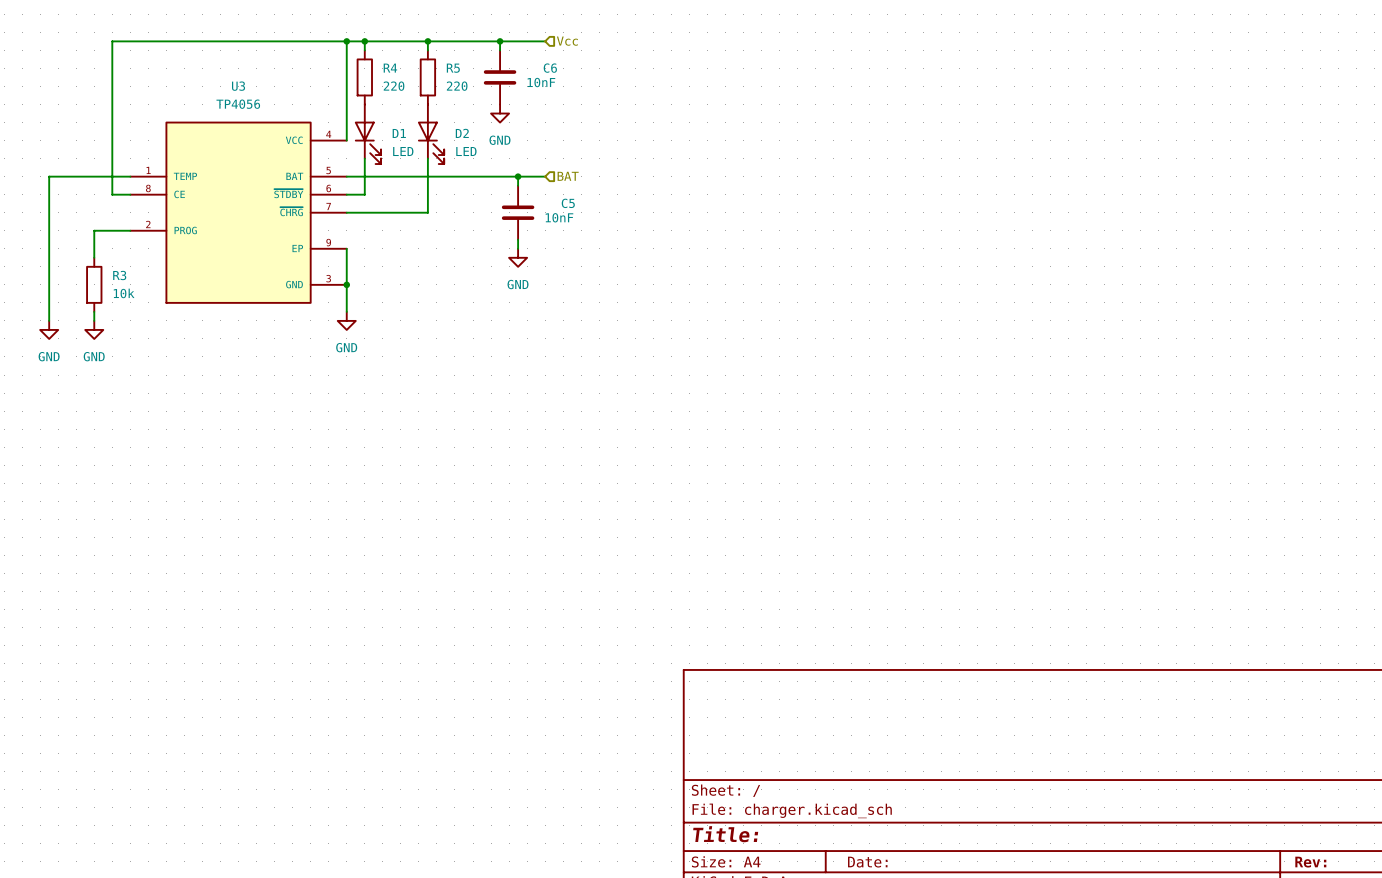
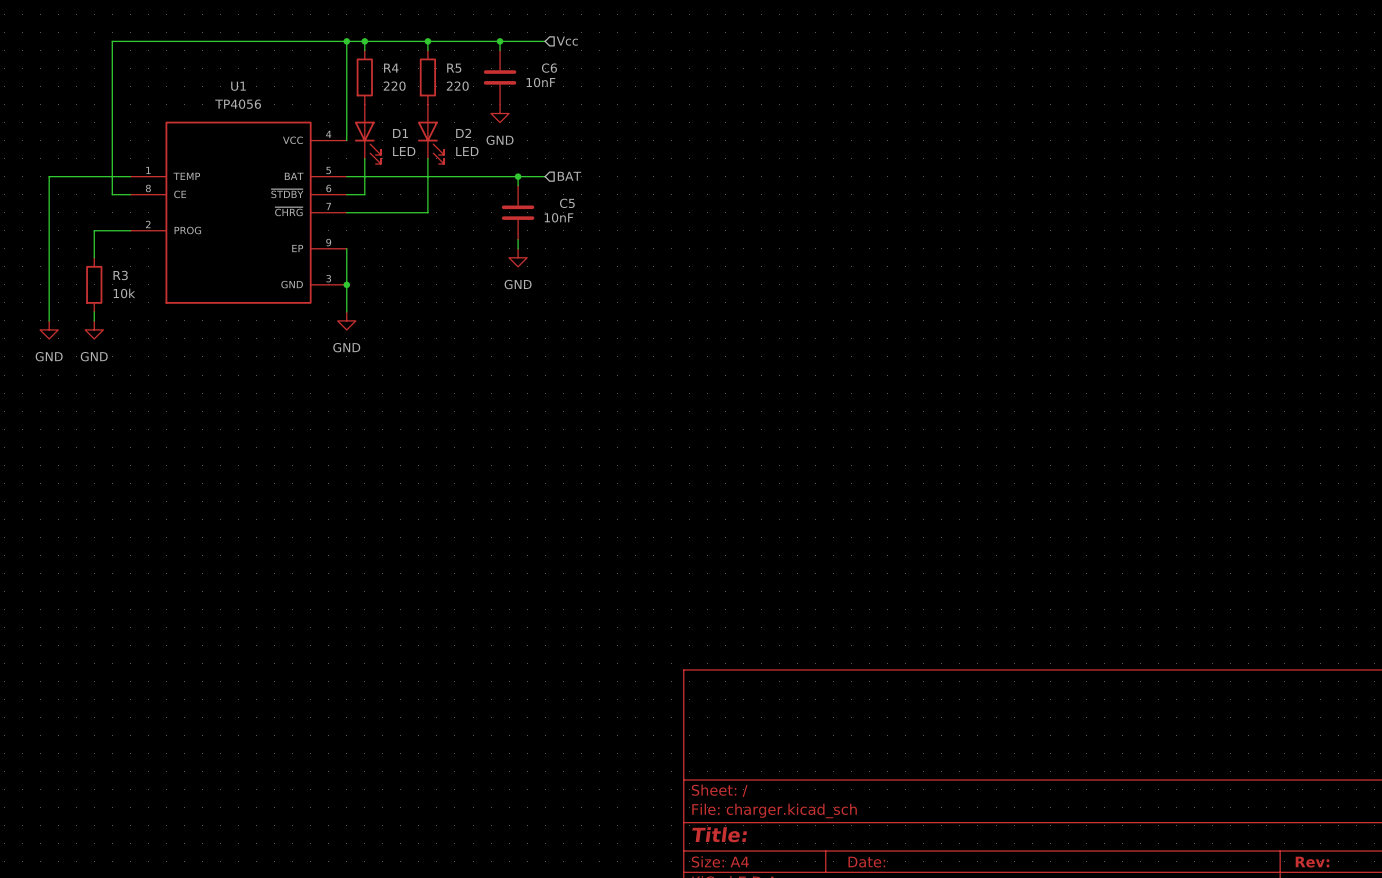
U3 name: U3 (238, 86) -> U1 (238, 86)

